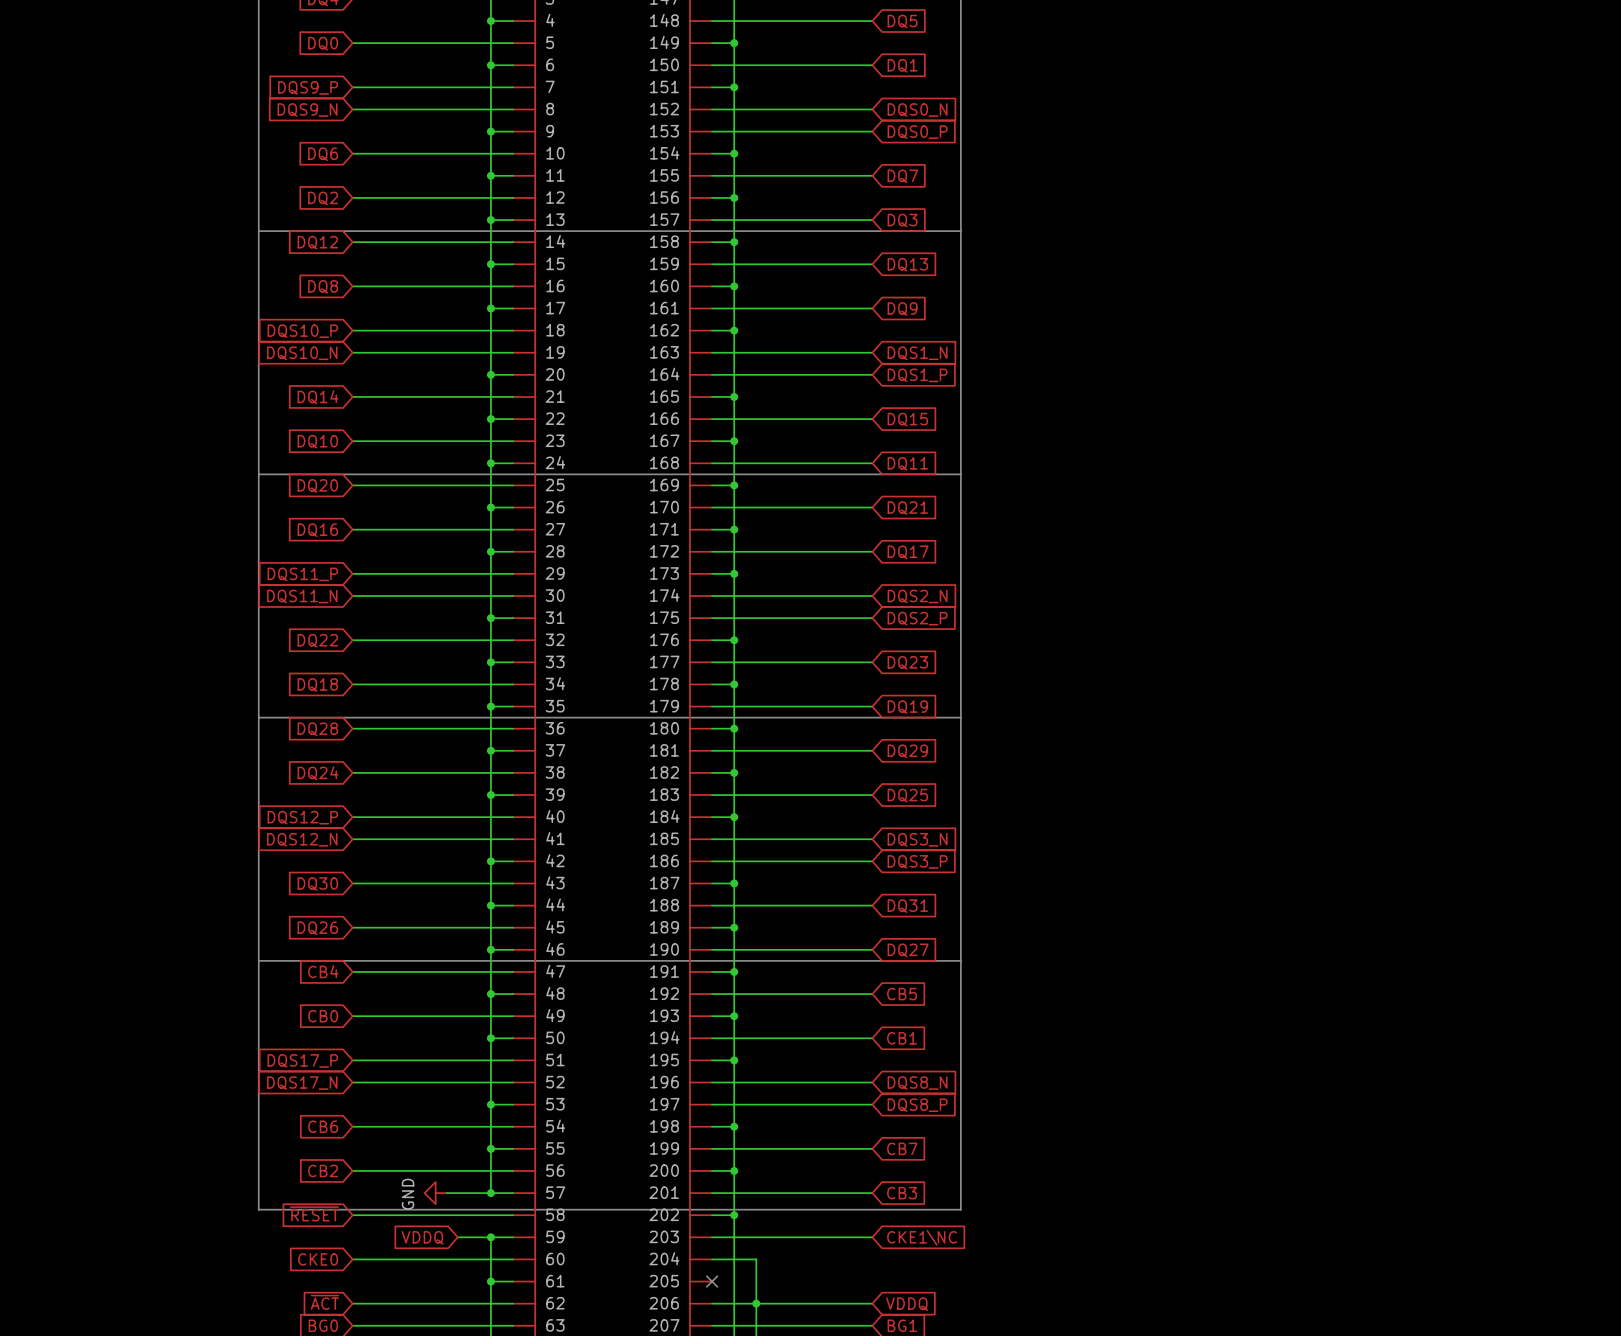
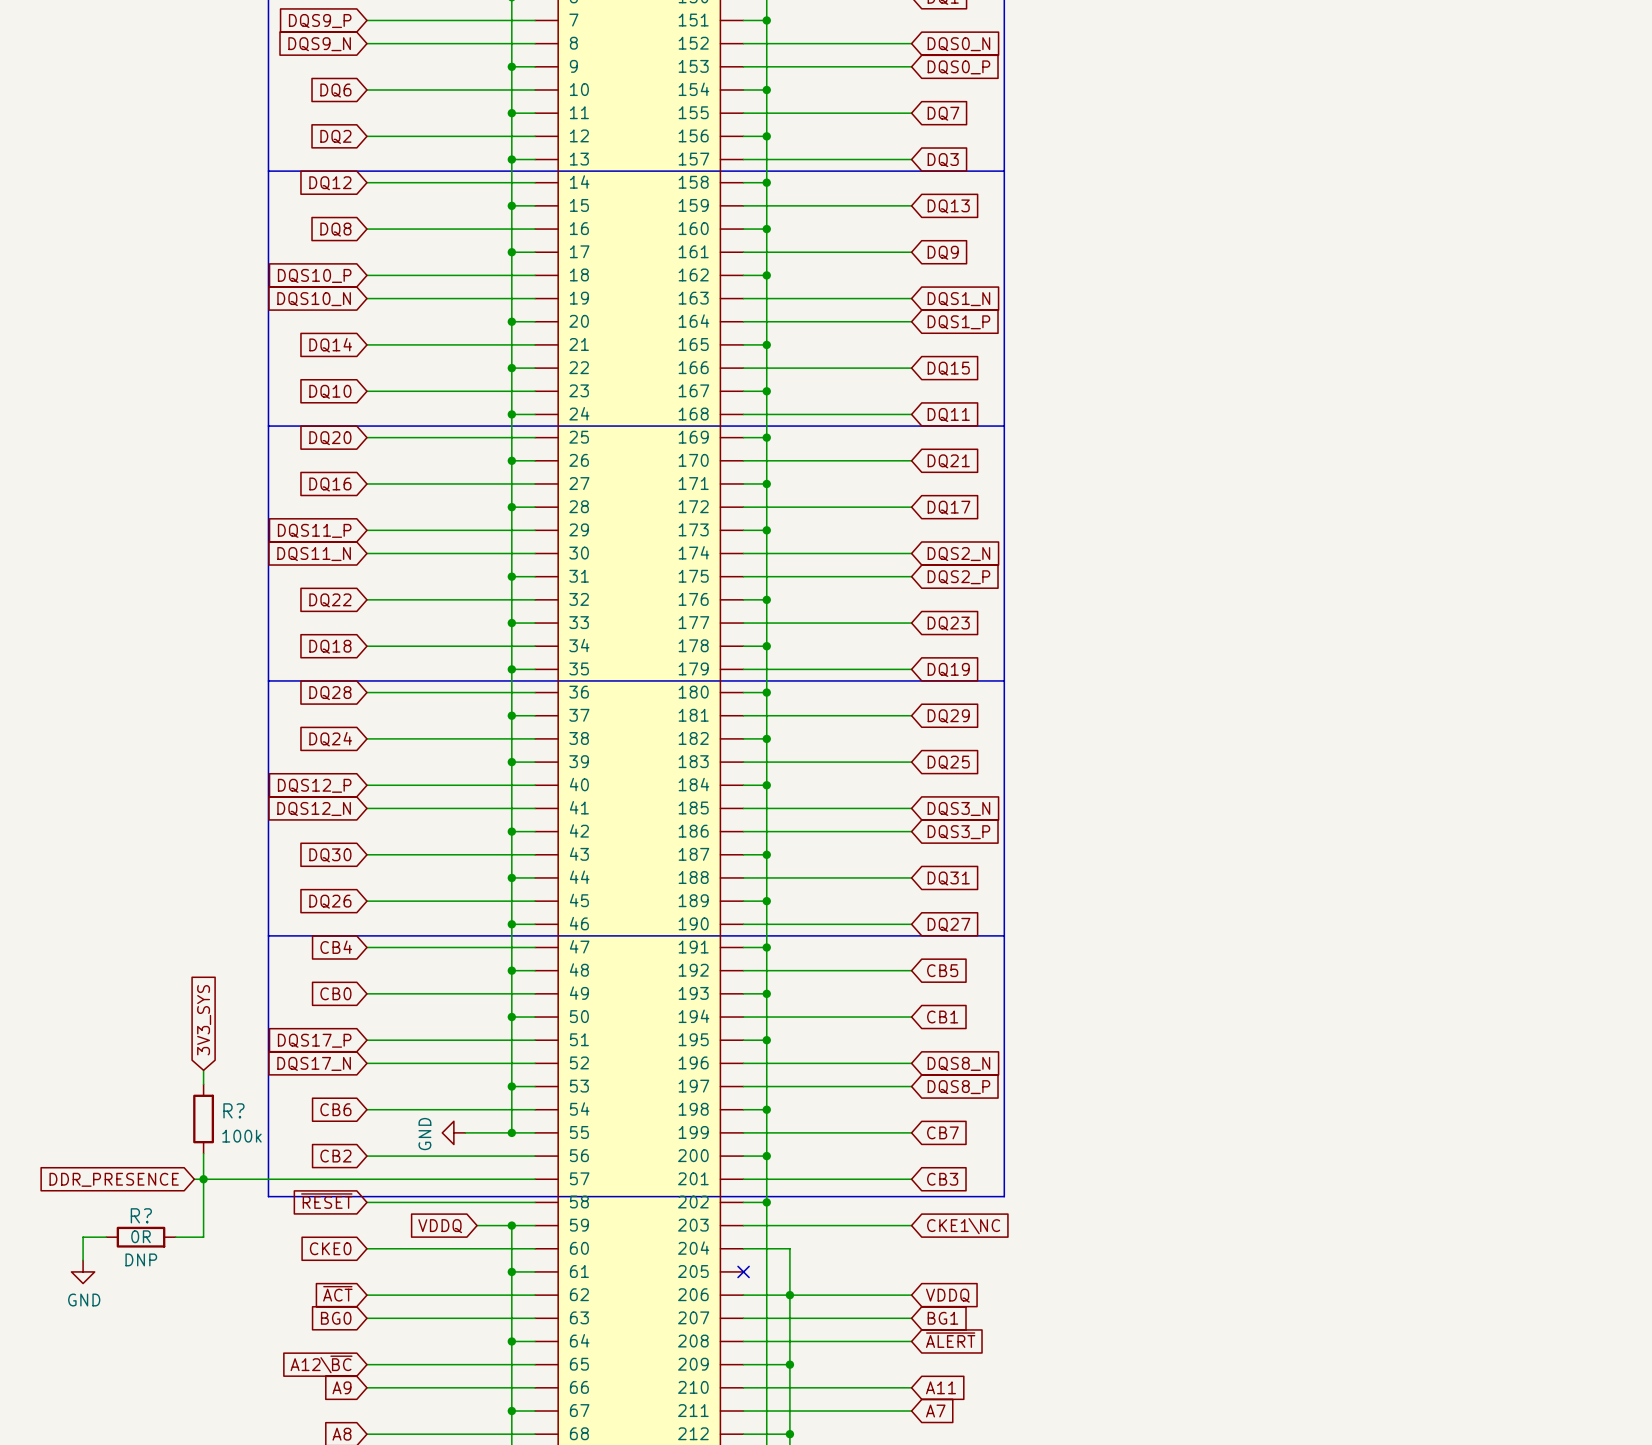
global label: none -> 3V3_SYS (204, 1020)
wire: none -> (203, 1070) (203, 1084)
R?: none -> (203, 1118)
wire: (490, 1148) (490, 1193) -> (511, 1132) (465, 1132)
wire: none -> (203, 1153) (203, 1237) (175, 1237)
global label: none -> DDR_PRESENCE (114, 1179)
wire: none -> (194, 1179) (465, 1179)
junction: none -> (203, 1179)
power symbol position: GND (435, 1193) -> GND (453, 1132)
junction: (490, 1193) -> none
wire: none -> (106, 1237) (83, 1237) (83, 1260)
R?: none -> (141, 1237)
power symbol: none -> GND (83, 1271)

